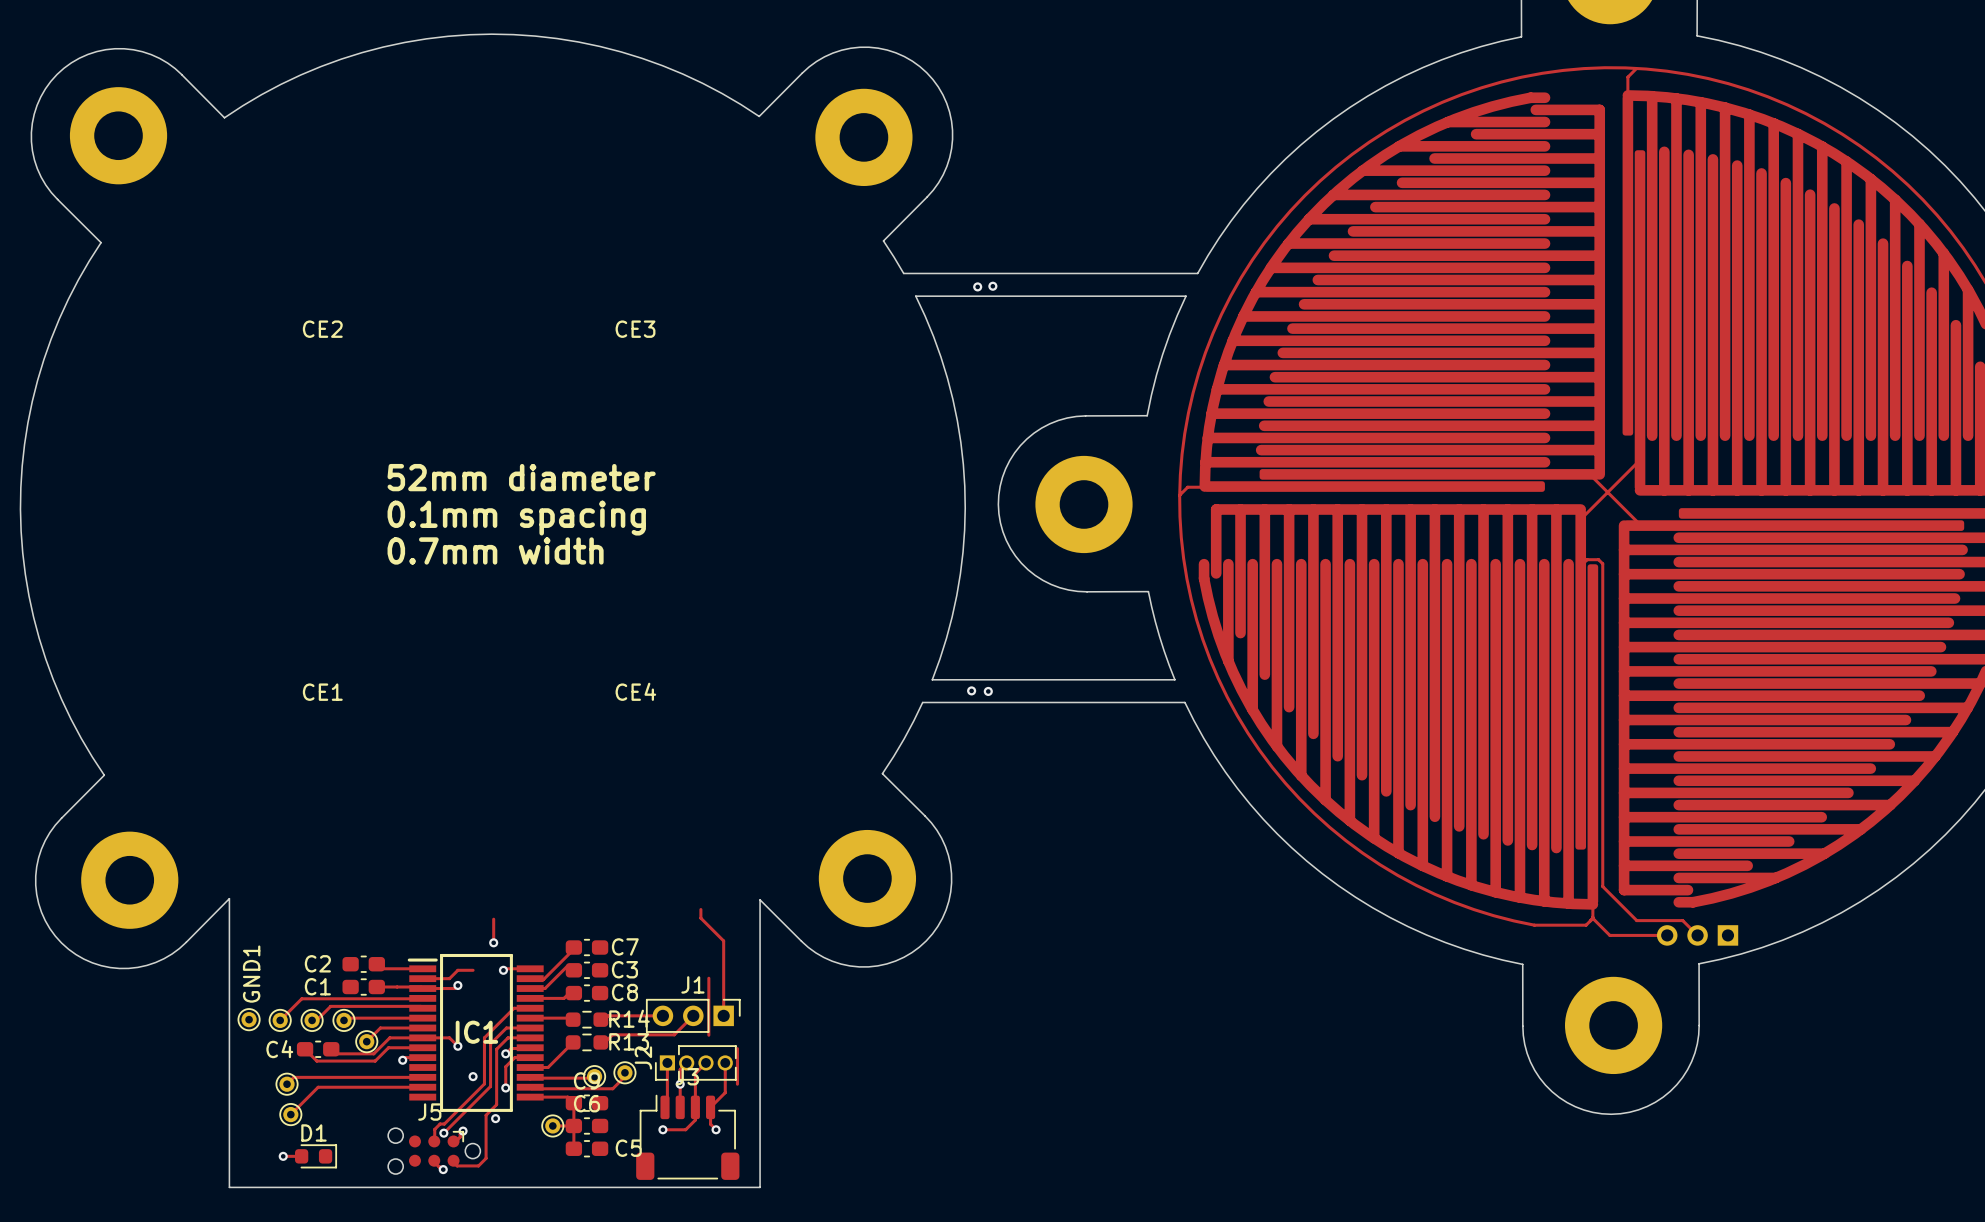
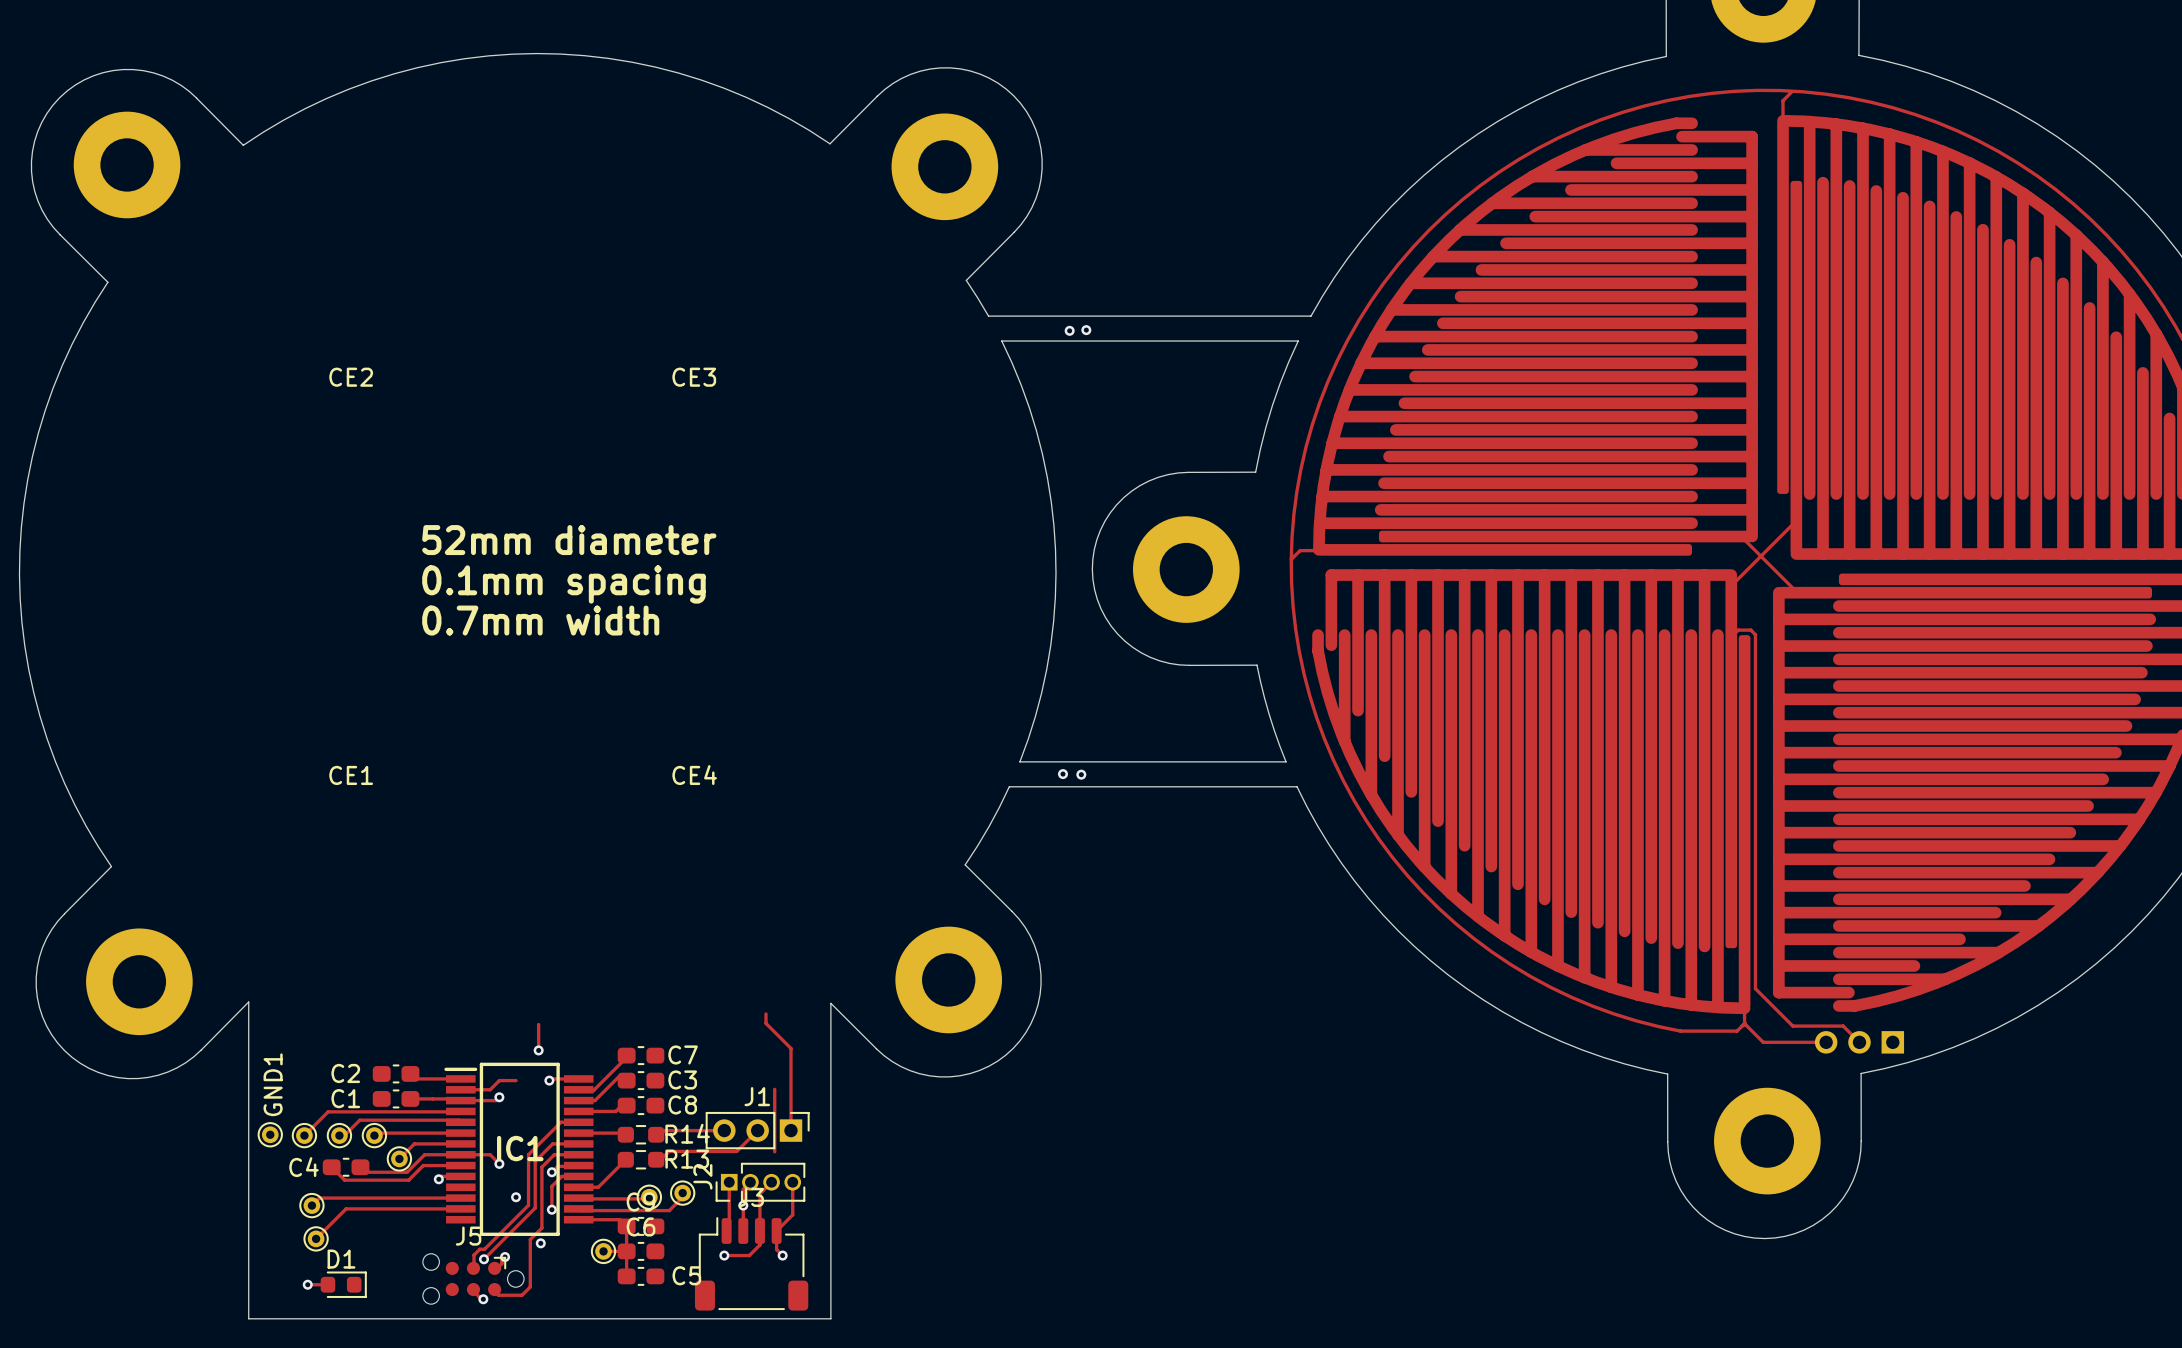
track: (737, 1048) (737, 1084) -> none

